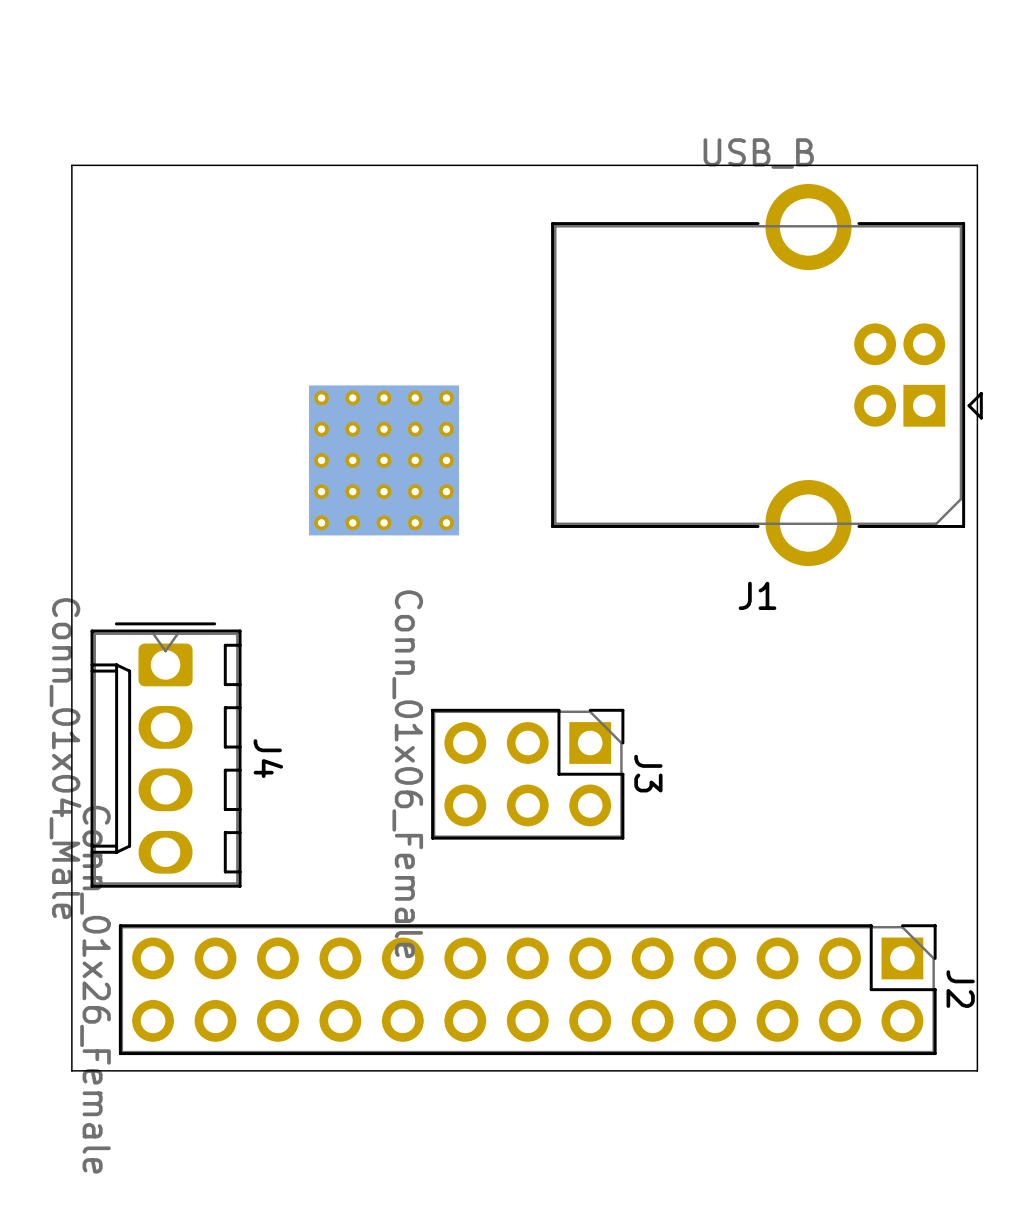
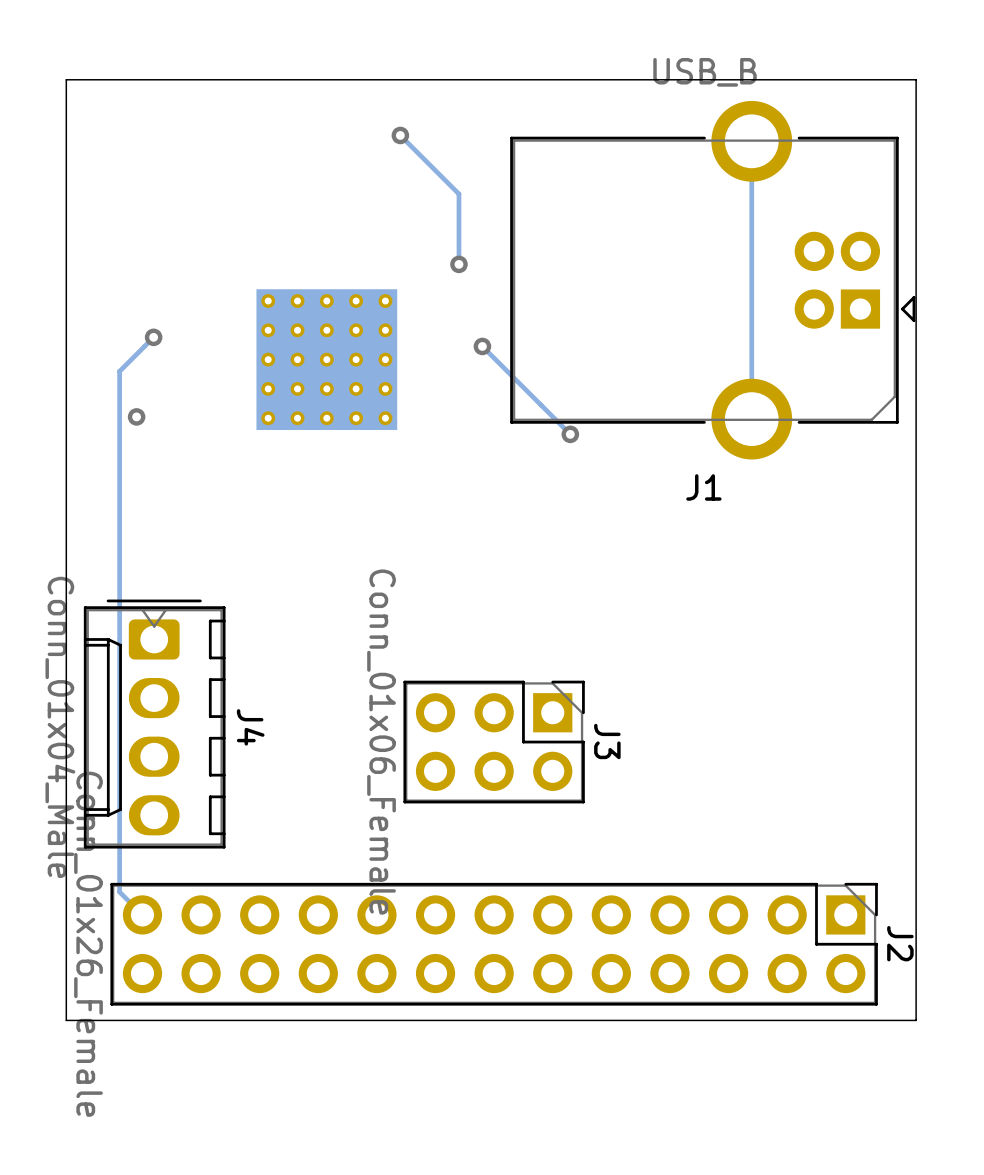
track: none -> (400, 135) (458, 194) (458, 264)
via: none -> (400, 135)
track: none -> (751, 141) (751, 419)
board edge: (977, 165) (71, 165) -> (916, 170) (916, 79) (66, 79) (66, 170)
via: none -> (458, 264)
track: none -> (153, 337) (119, 371) (119, 892) (142, 914)
via: none -> (153, 337)
track: none -> (482, 346) (570, 434)
via: none -> (482, 346)
J1 position: (766, 375) -> (712, 280)
via: none -> (136, 416)
via: none -> (570, 434)
part position: (384, 460) -> (326, 359)

